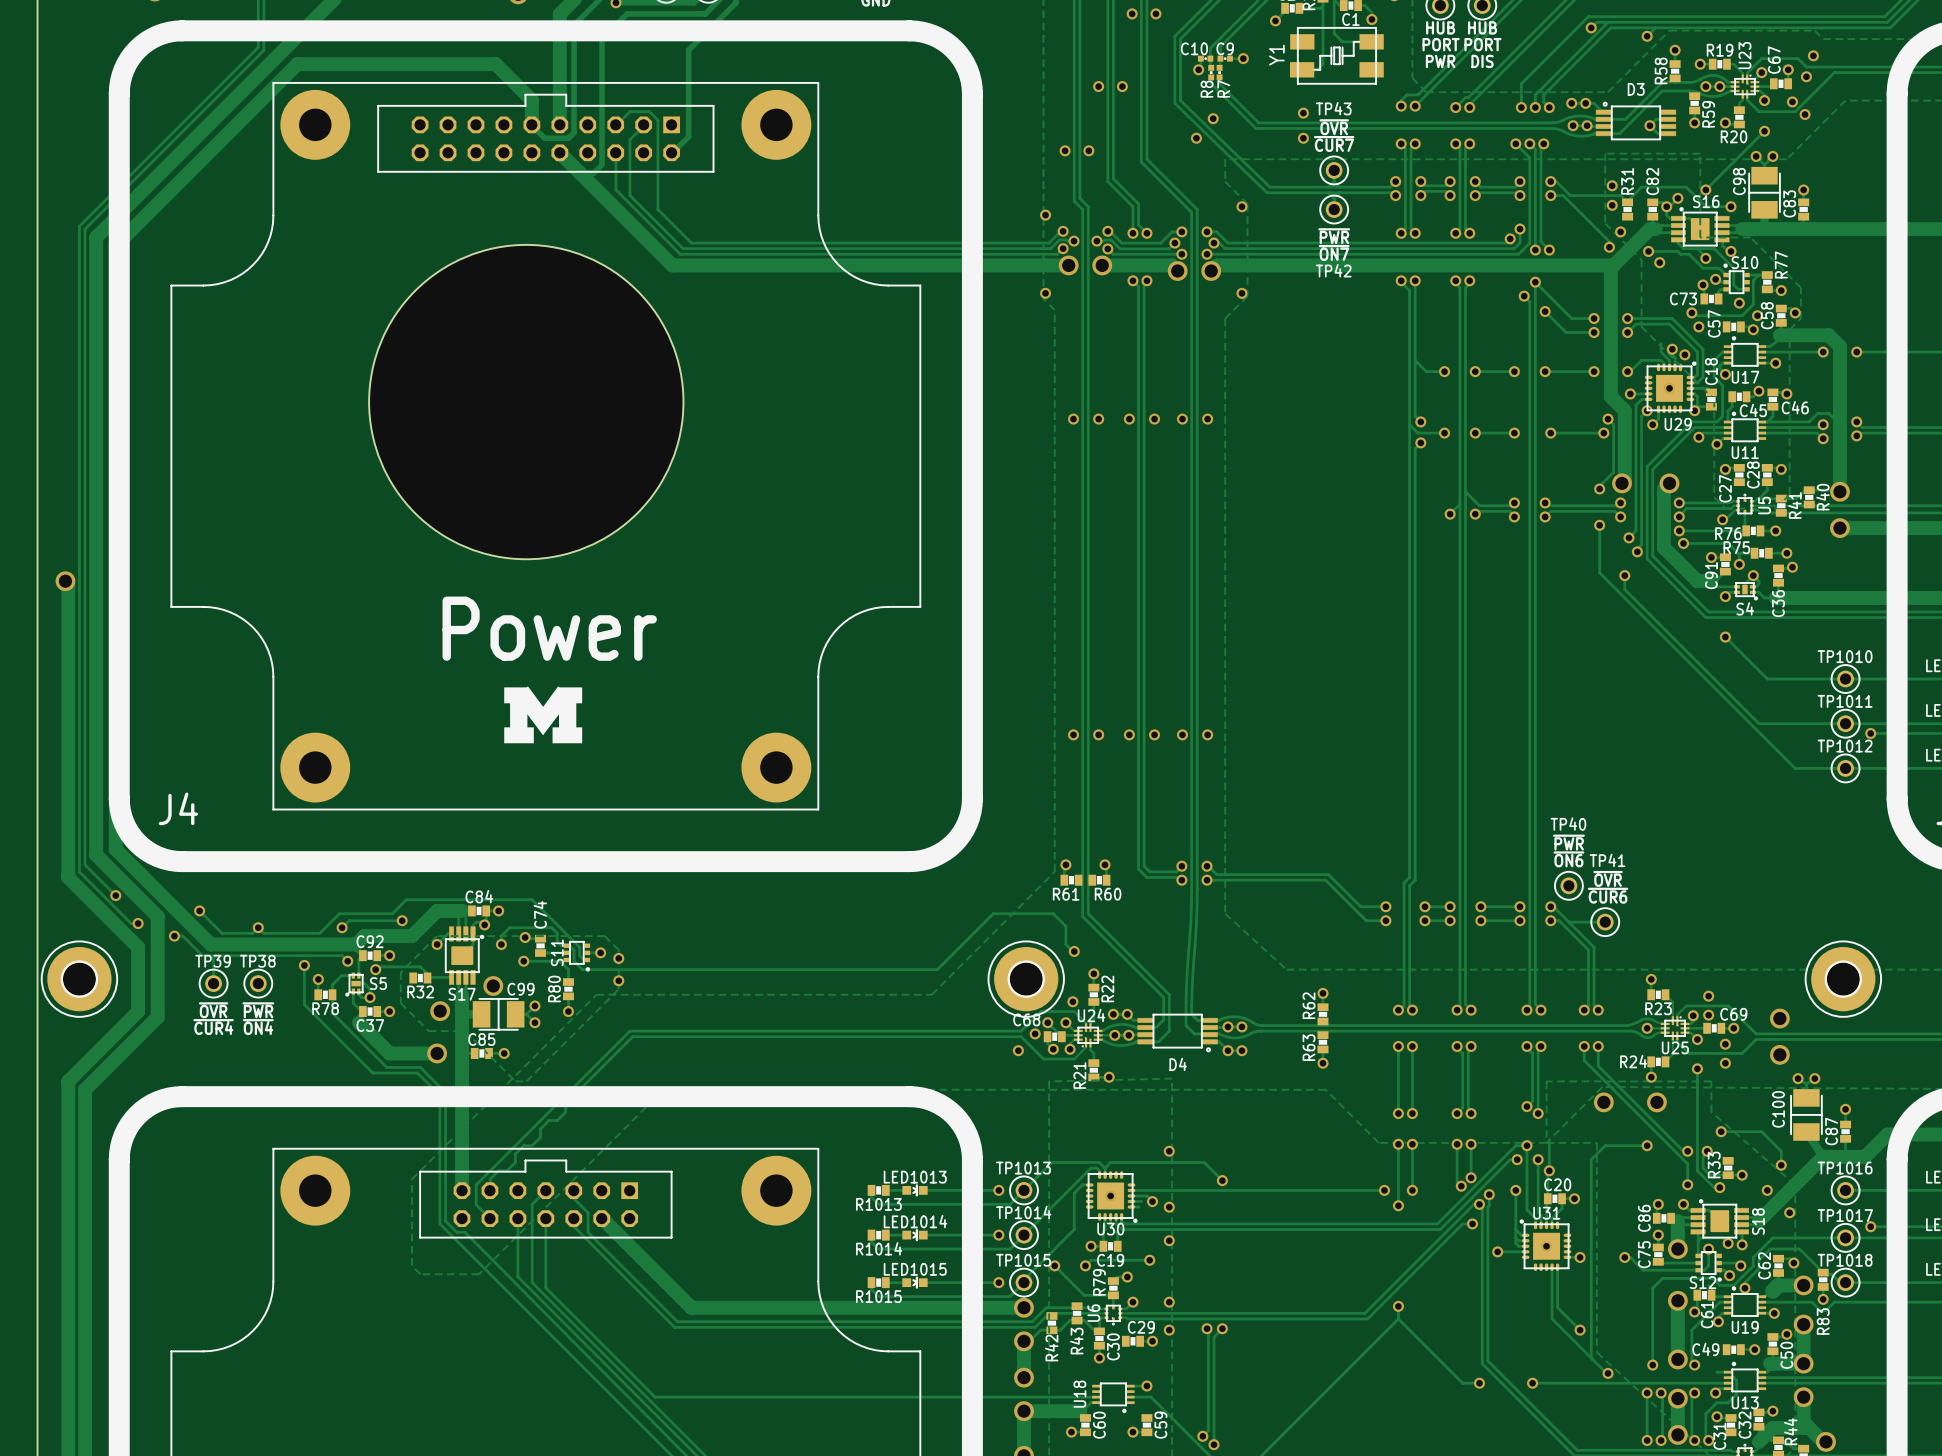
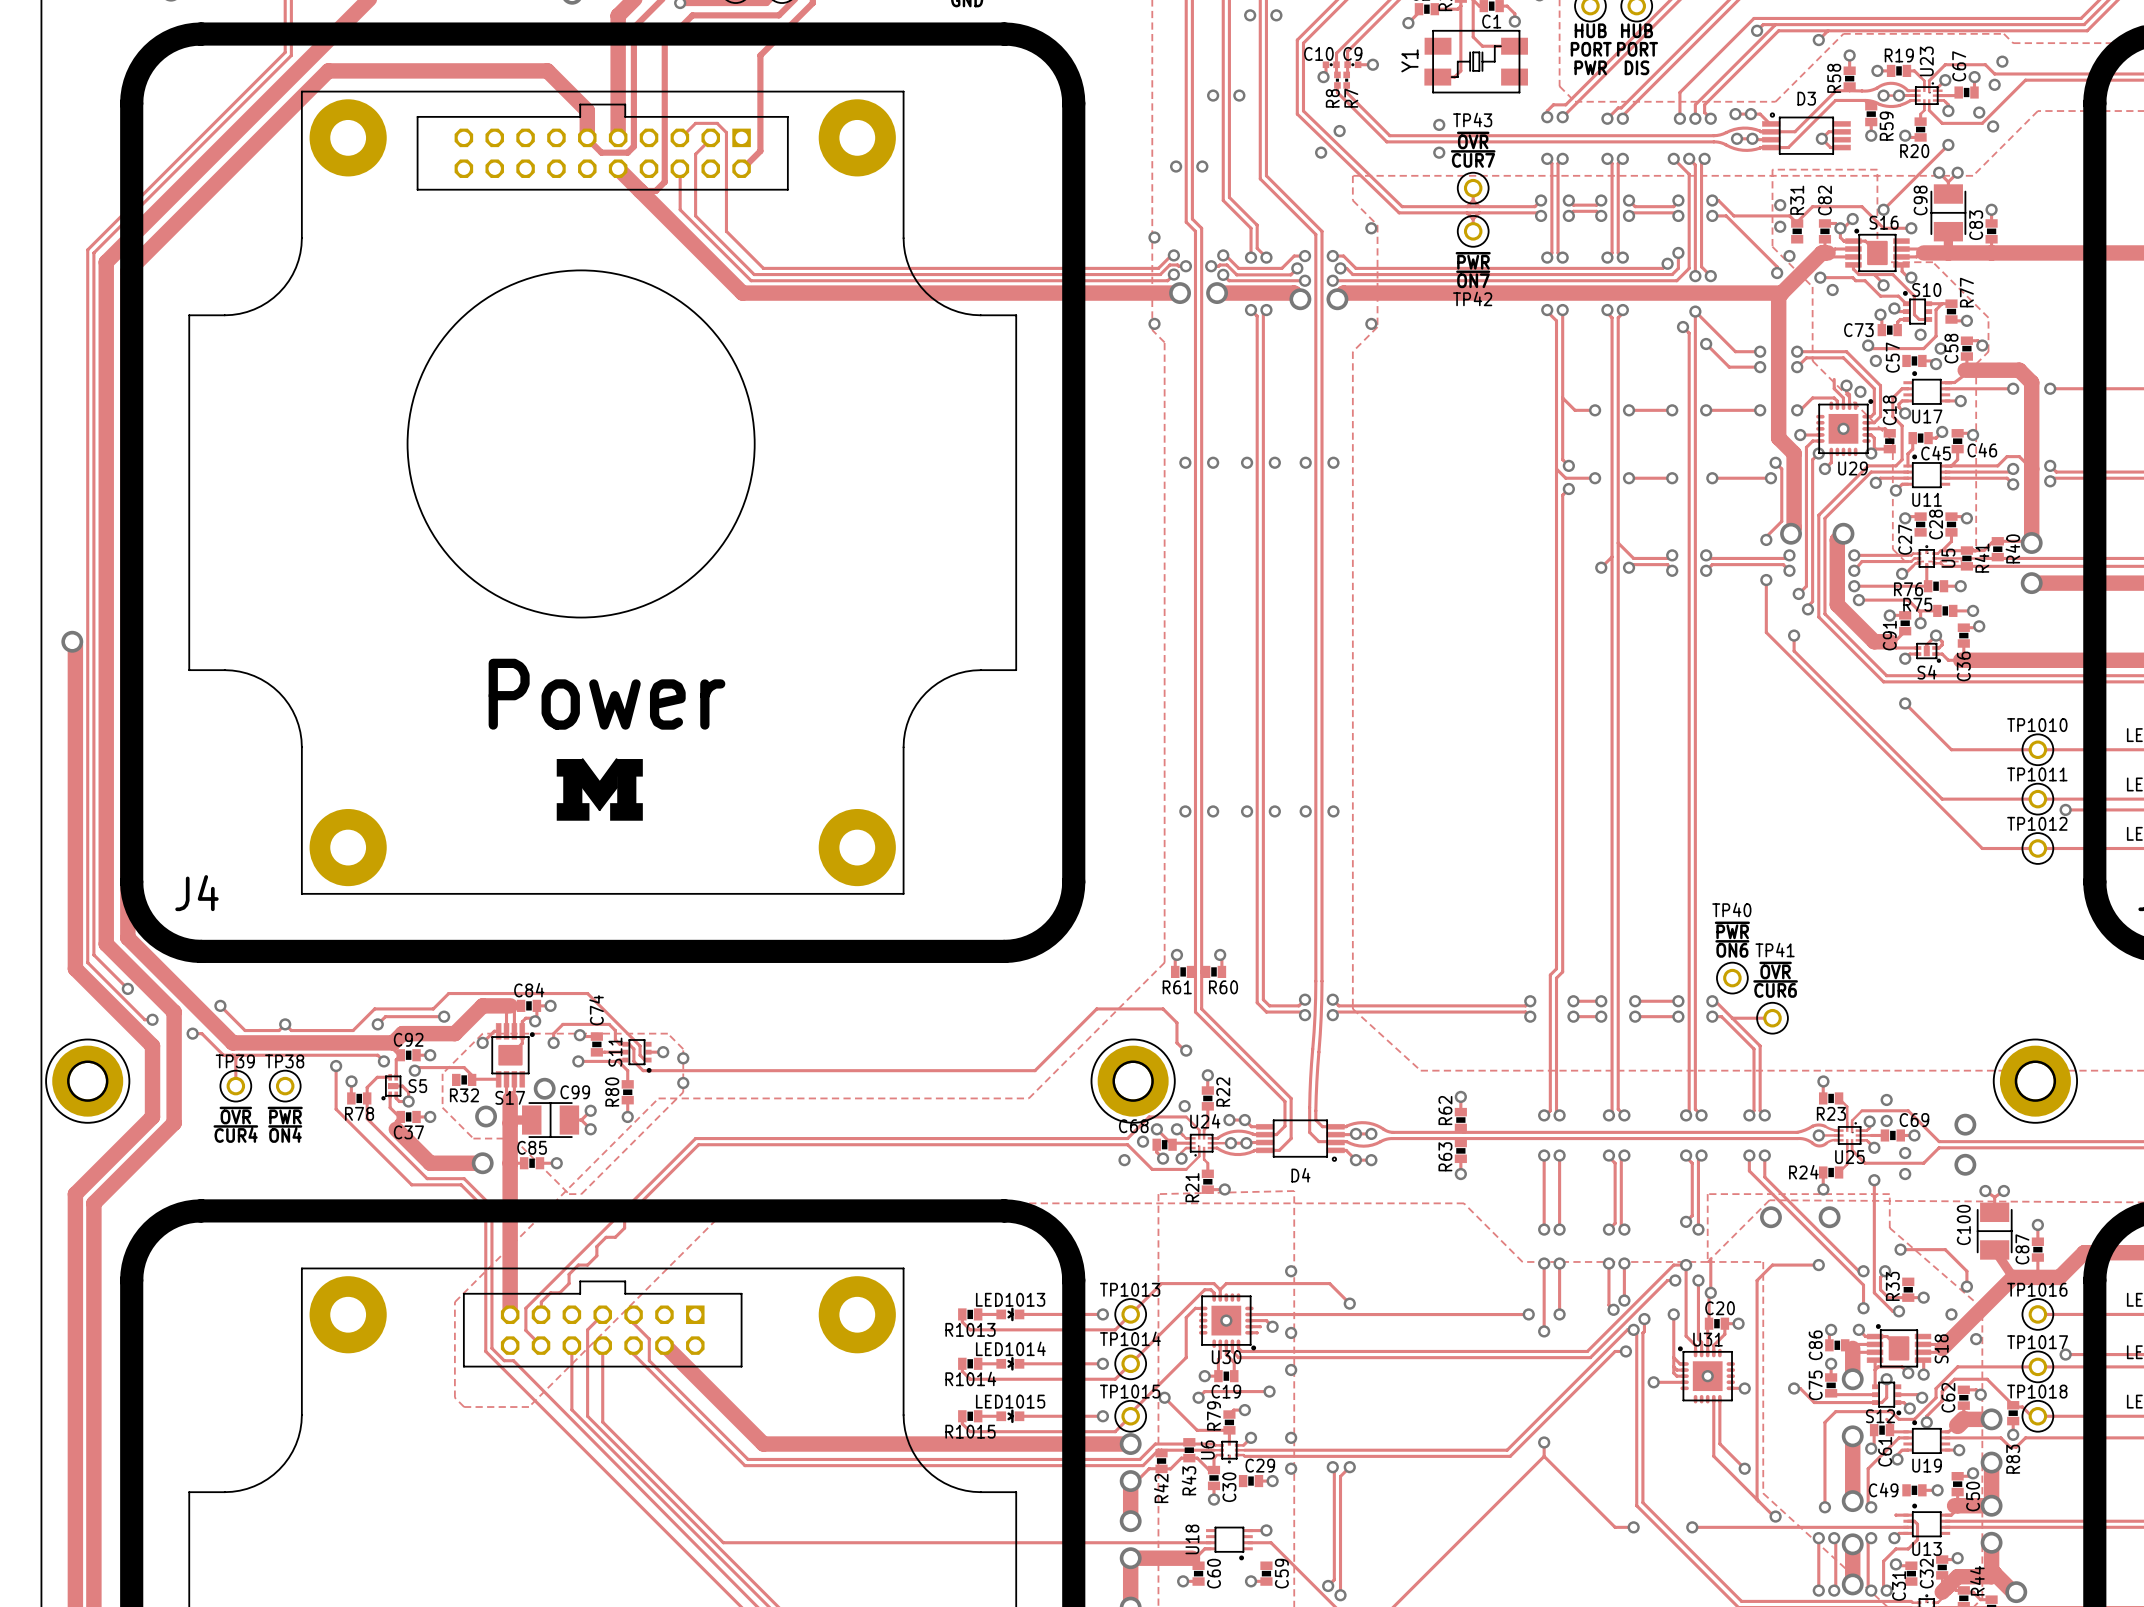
track: (1144, 866) (1149, 871) (1176, 871) (1181, 866) -> (1263, 956) (1263, 999) (1269, 1005) (1298, 1005) (1305, 999)
via: (1181, 866) -> none
track: (1207, 866) (1216, 874) (1328, 874) (1360, 906) (1385, 906) -> (1332, 999) (1338, 1005) (1525, 1005) (1530, 1001)
via: (1207, 866) -> none
track: (1138, 869) (1146, 877) (1179, 877) (1181, 880) -> (1257, 959) (1257, 1002) (1266, 1012) (1301, 1012) (1305, 1015)
via: (1181, 880) -> none
track: (1207, 880) (1325, 880) (1366, 920) (1385, 920) -> (1332, 1015) (1335, 1012) (1525, 1012) (1530, 1016)
via: (1207, 880) -> none
via: none -> (1305, 999)
via: none -> (1332, 999)
via: none -> (1305, 1015)
via: none -> (1332, 1015)

